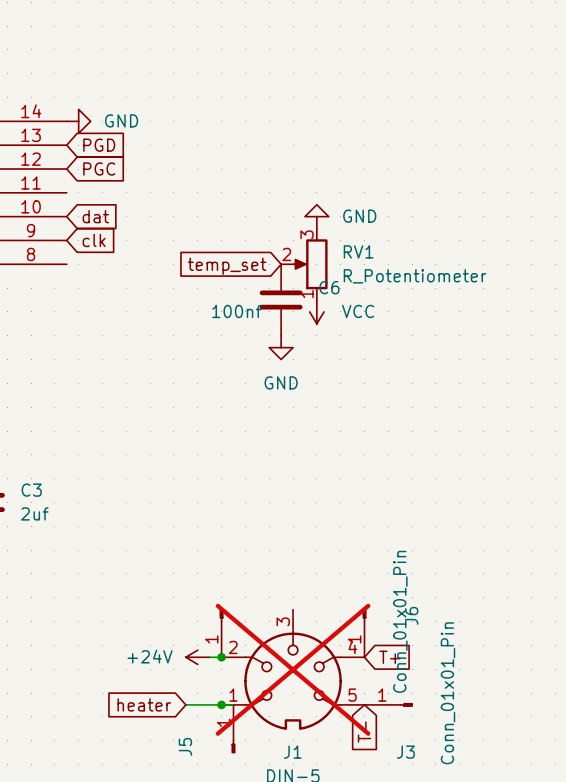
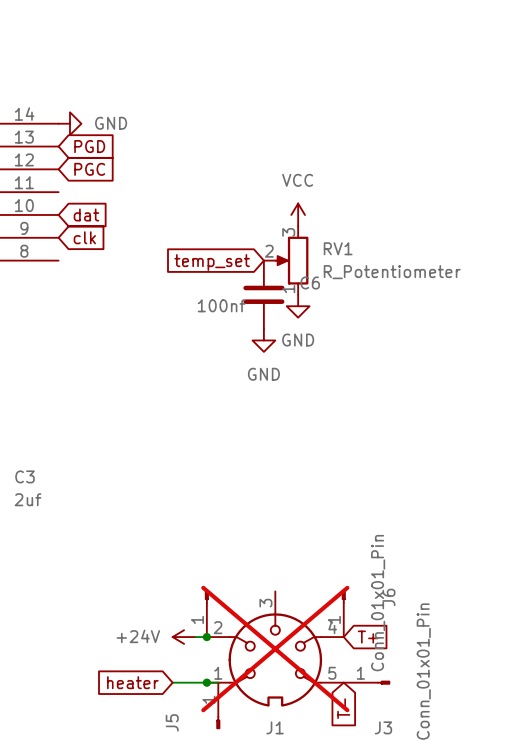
power symbol: GND (316, 216) -> VCC (298, 214)
power symbol: VCC (316, 311) -> GND (298, 306)

